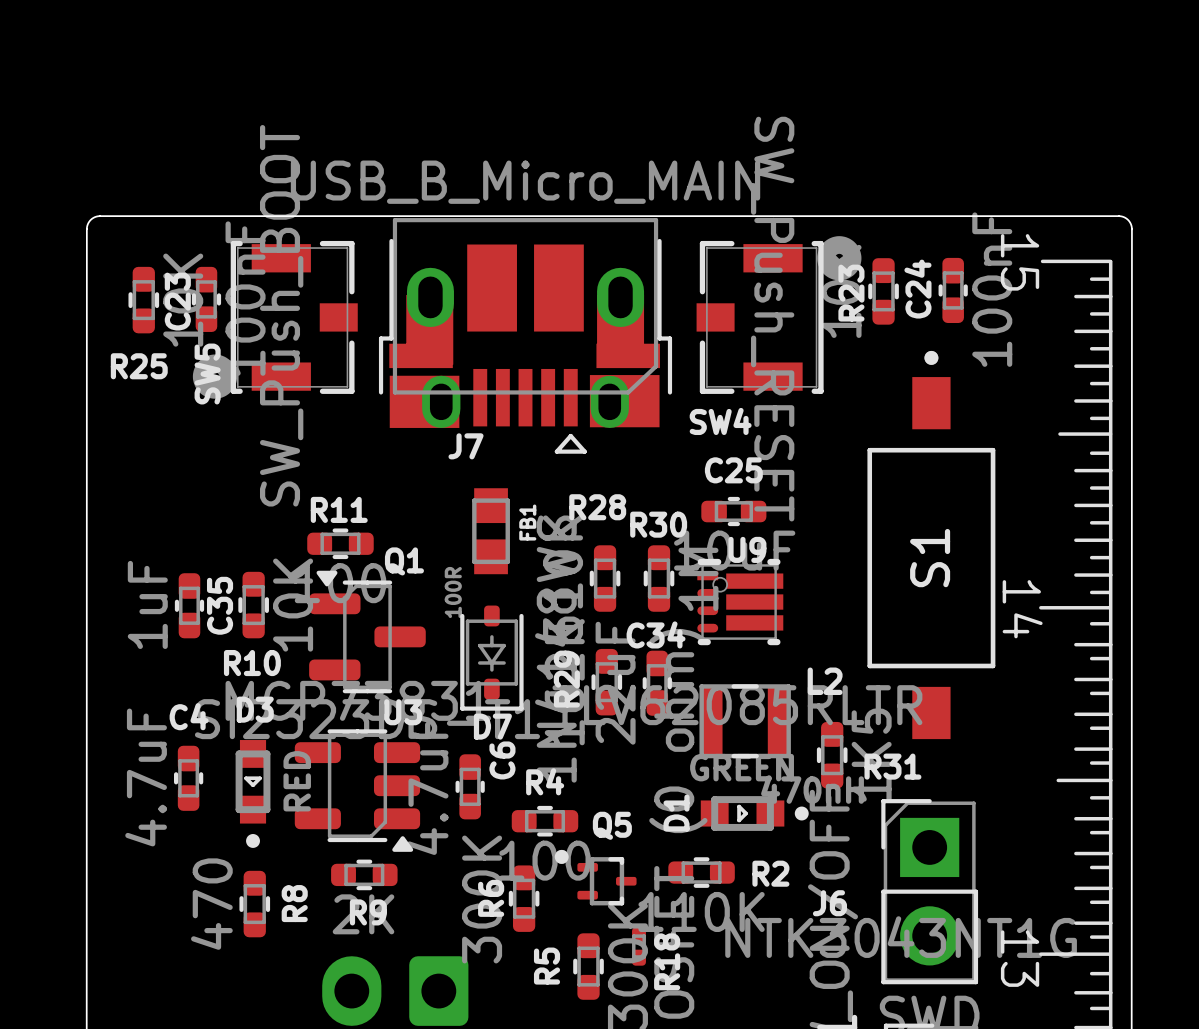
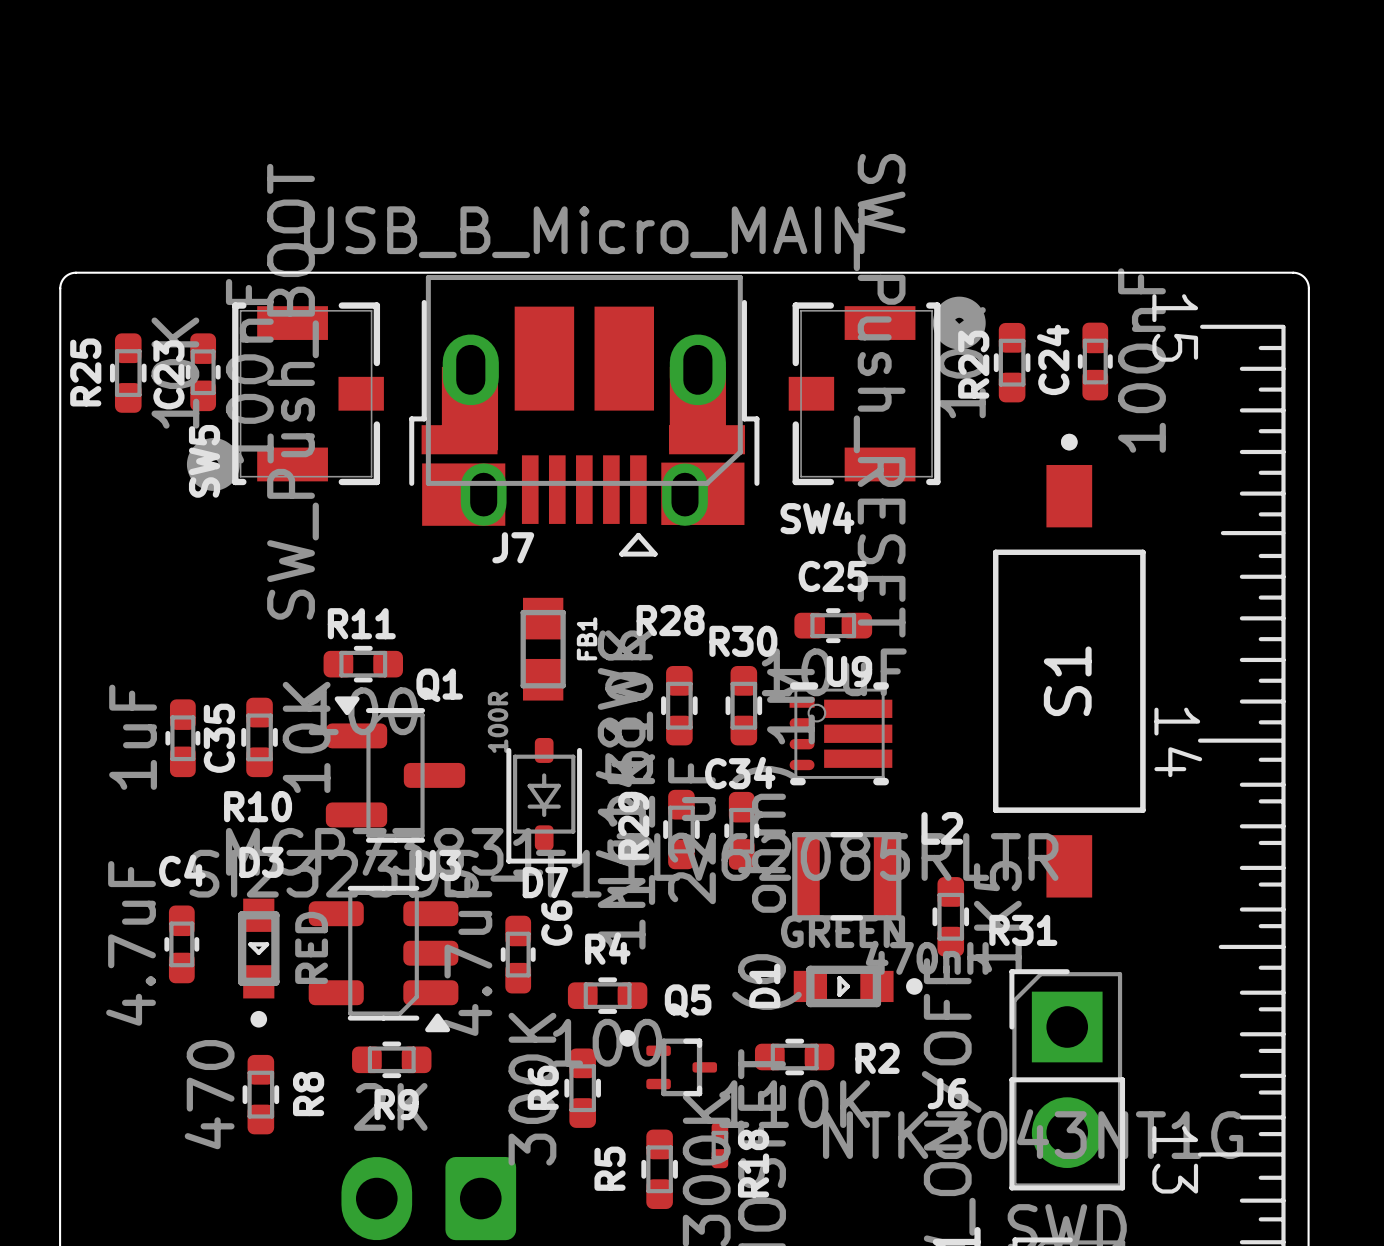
R25 name rotation: 0° (139, 366) -> 90° counterclockwise (85, 372)
R25 name position: R25 (139, 366) -> R25 (85, 372)

